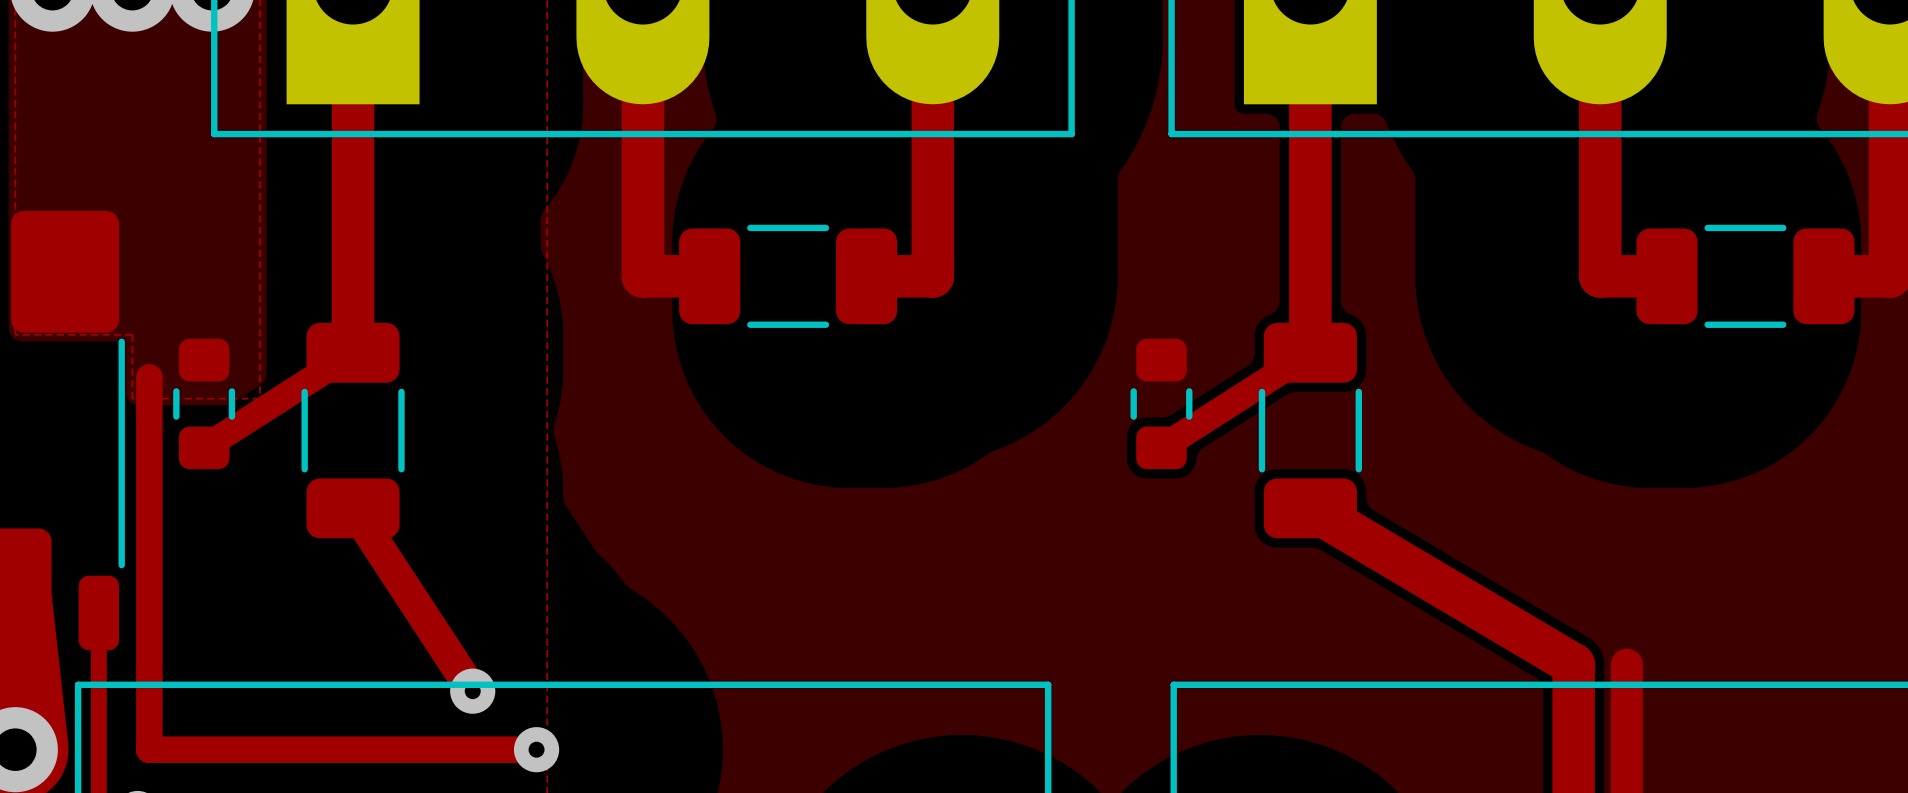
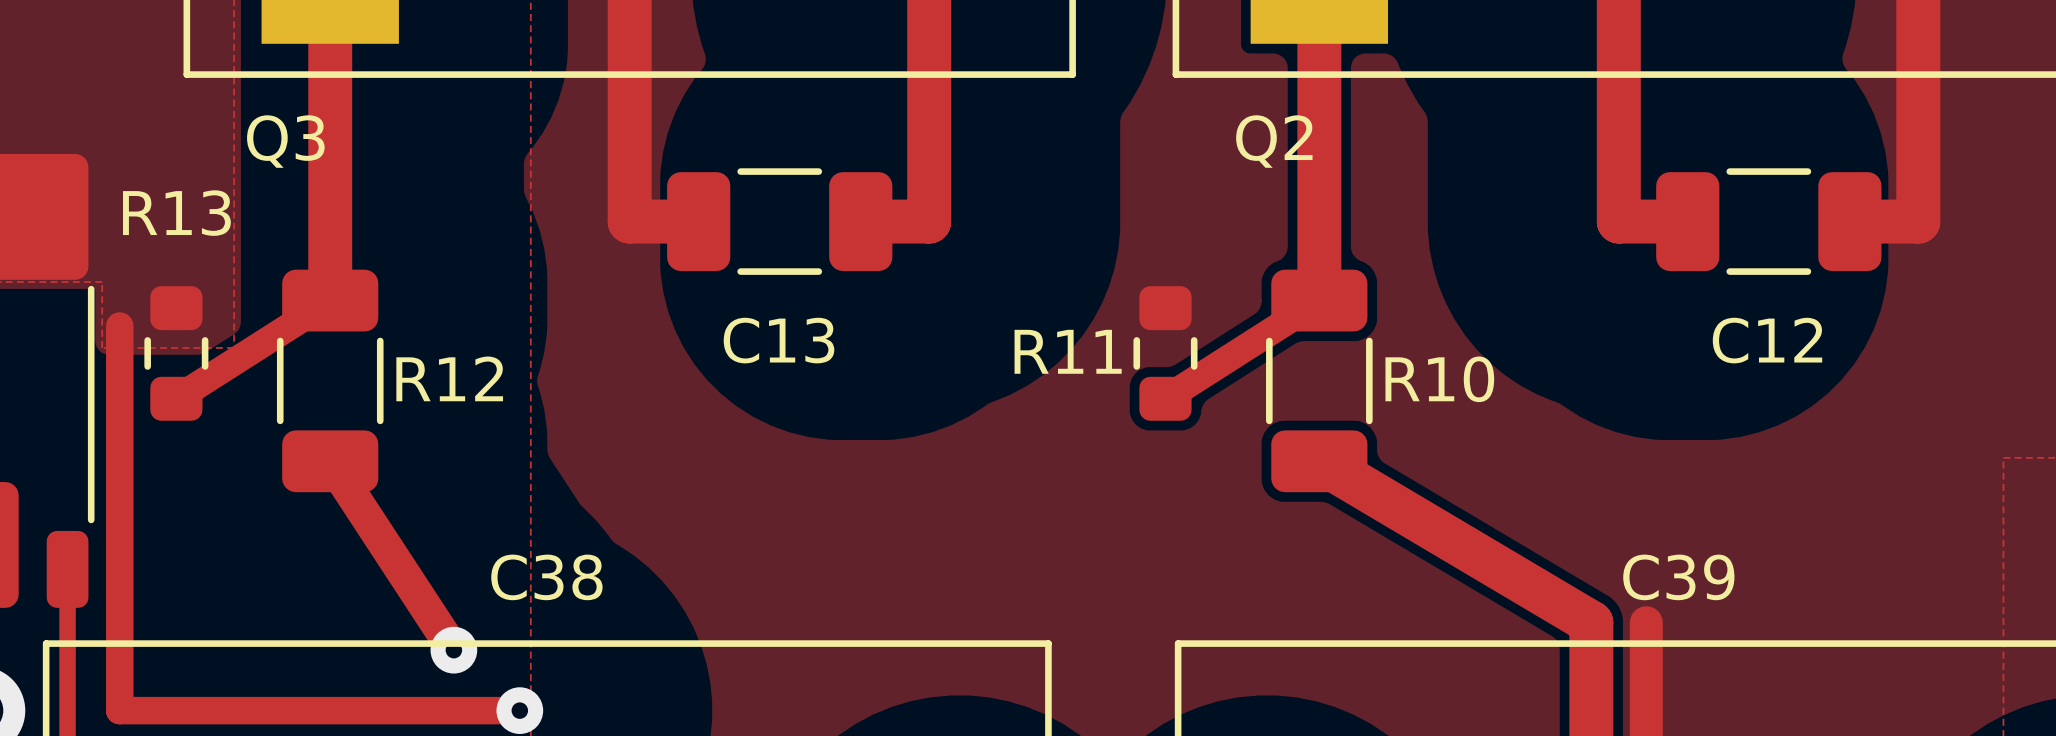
Q3 name: none -> Q3 (285, 141)
Q2 name: none -> Q2 (1274, 141)
R13 name: none -> R13 (176, 213)
C13 name: none -> C13 (779, 340)
C12 name: none -> C12 (1767, 340)
R11 name: none -> R11 (1068, 351)
R12 name: none -> R12 (449, 378)
R10 name: none -> R10 (1439, 379)
C38 name: none -> C38 (546, 577)
C39 name: none -> C39 (1678, 577)

